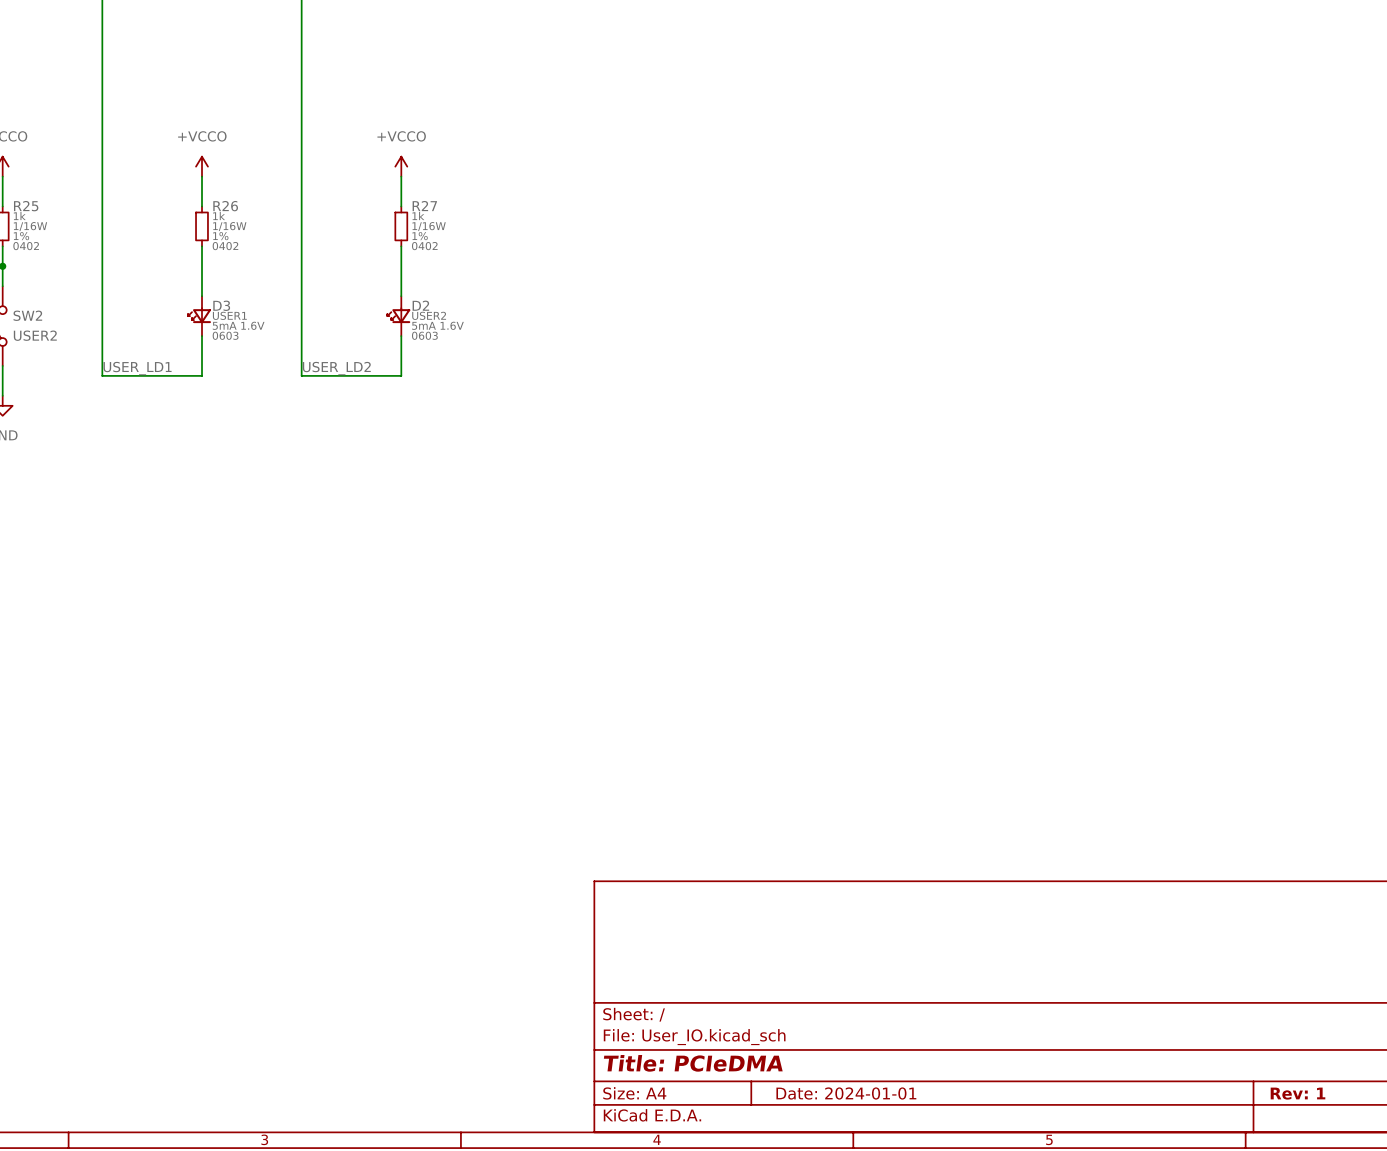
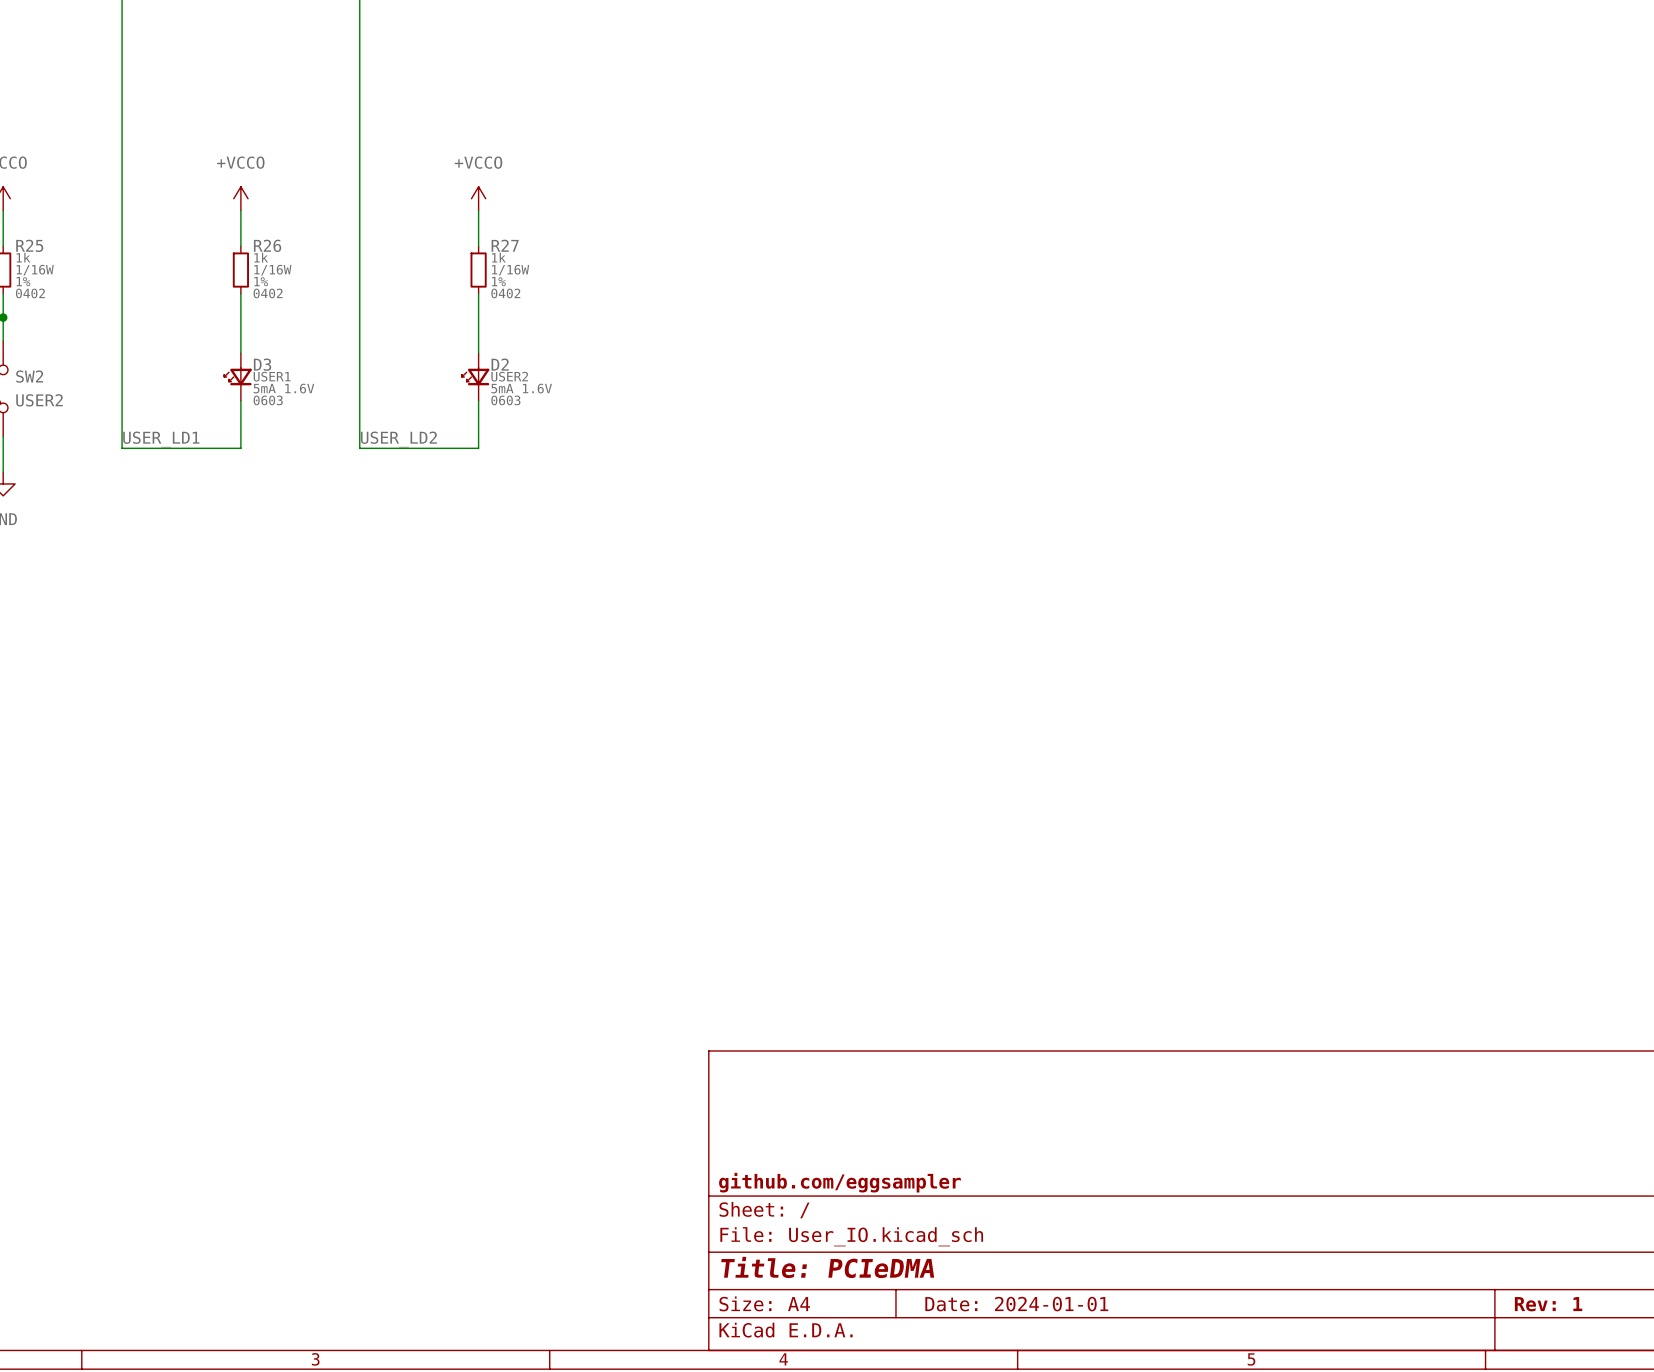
title block: none -> github.com/eggsampler (839, 1182)

